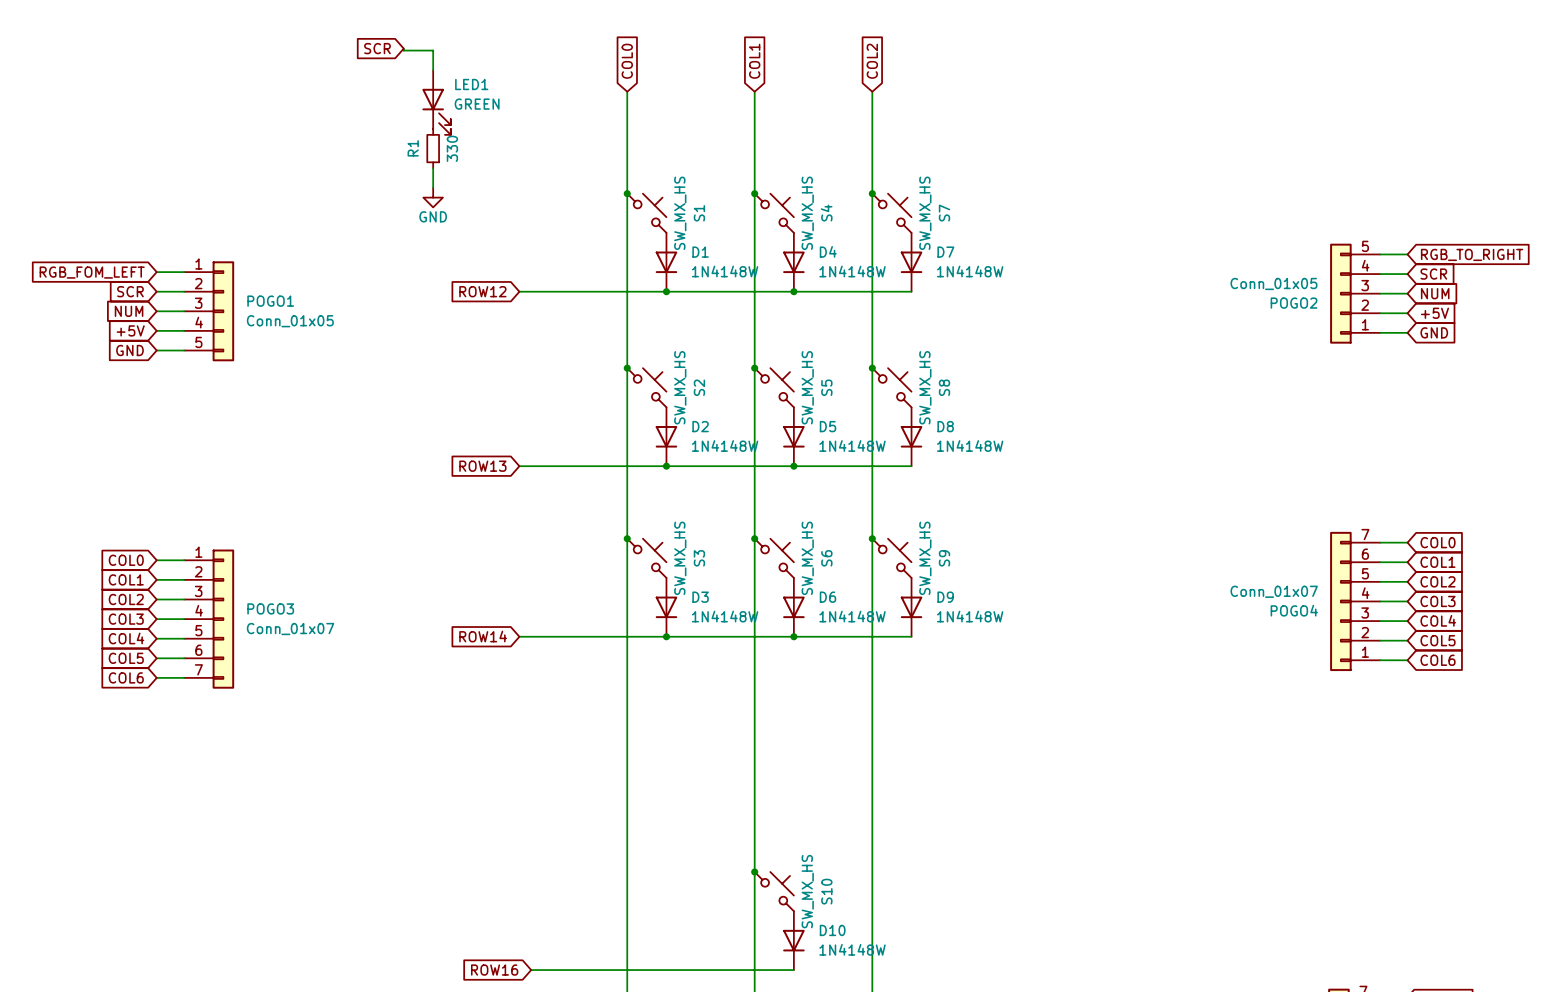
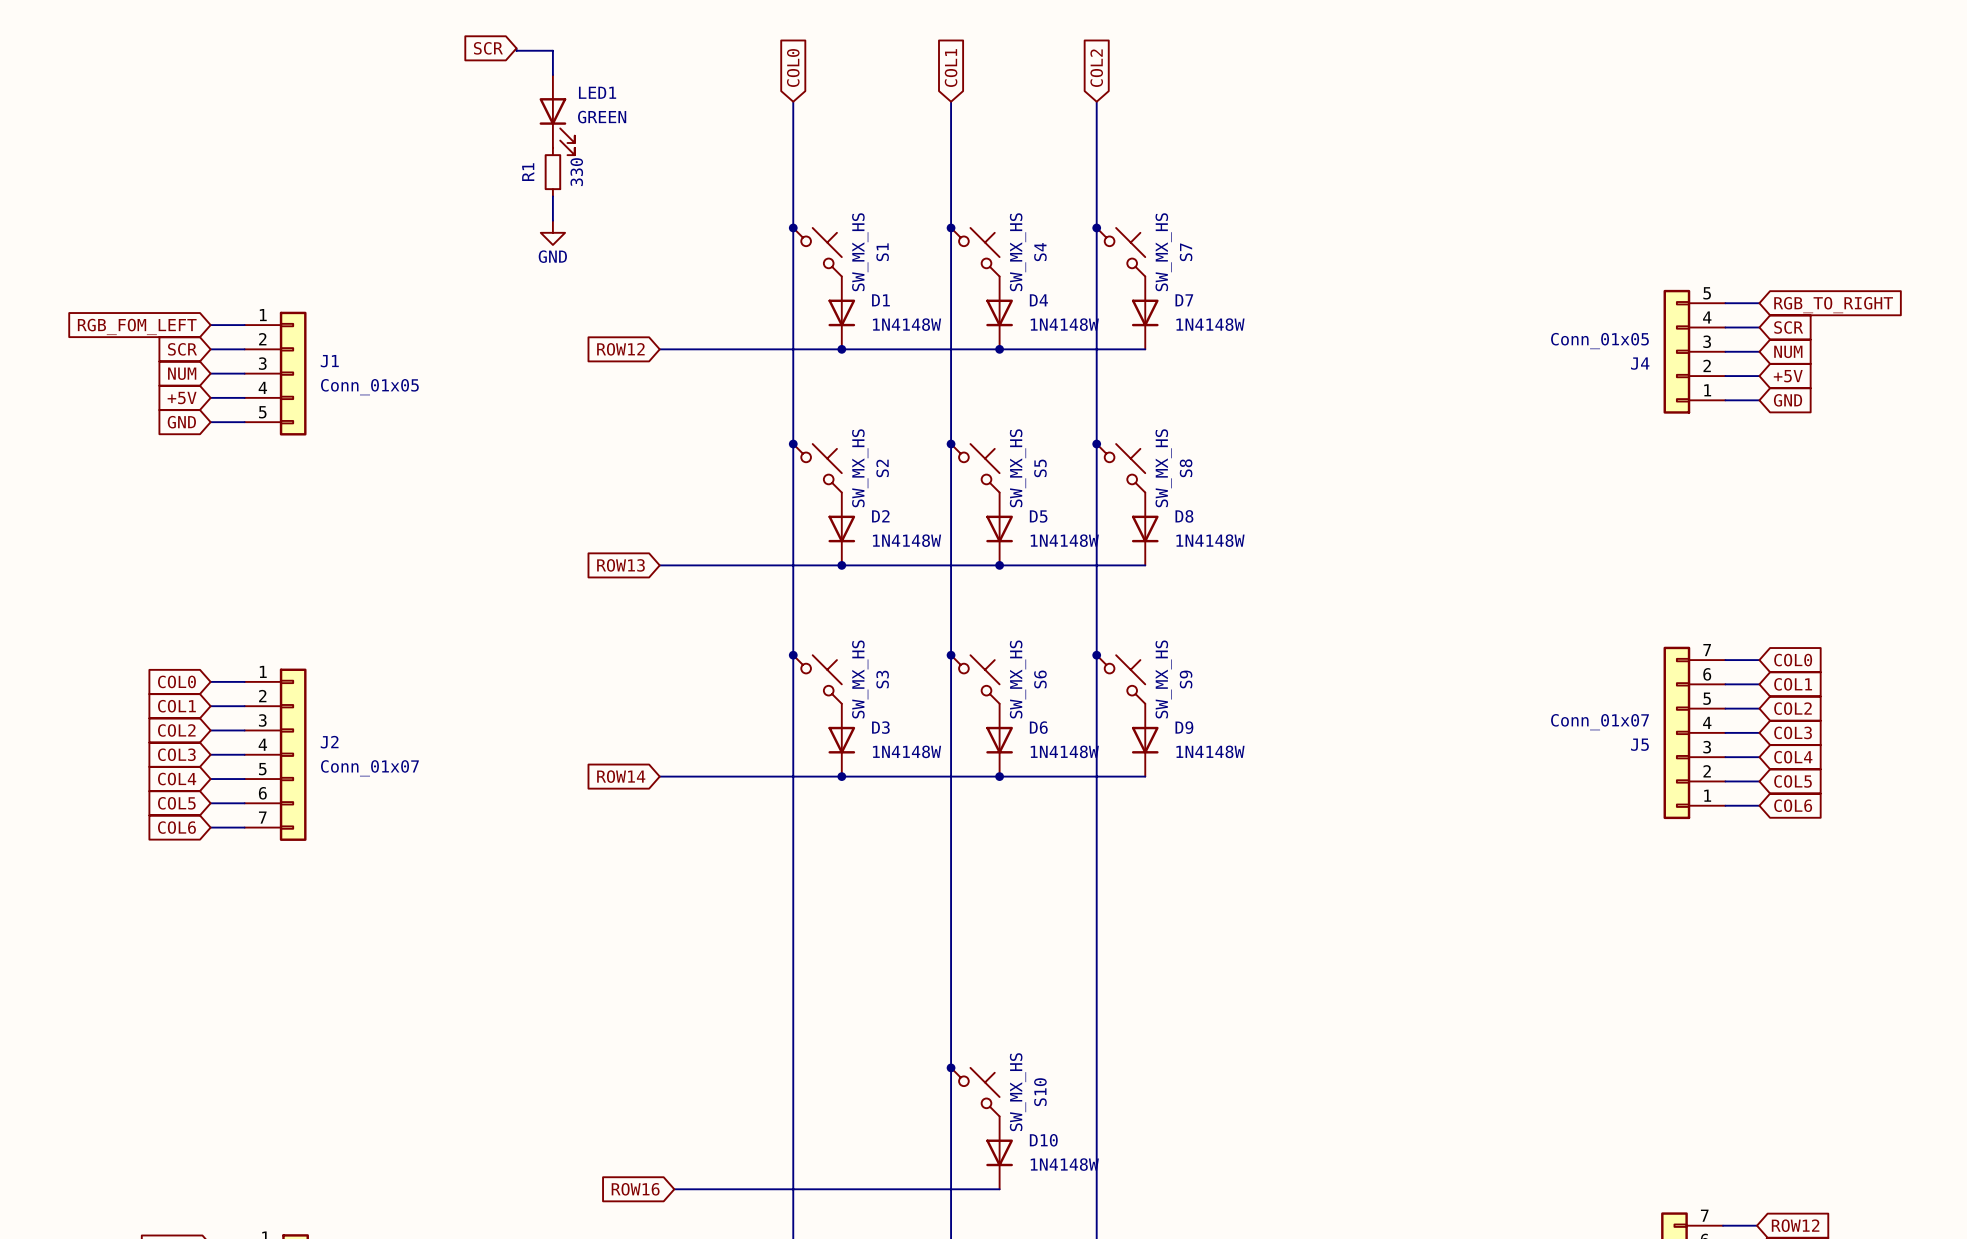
POGO1 name: POGO1 (270, 301) -> J1 (329, 361)
POGO2 name: POGO2 (1294, 303) -> J4 (1640, 363)
POGO3 name: POGO3 (270, 608) -> J2 (329, 742)
POGO4 name: POGO4 (1294, 610) -> J5 (1639, 744)

